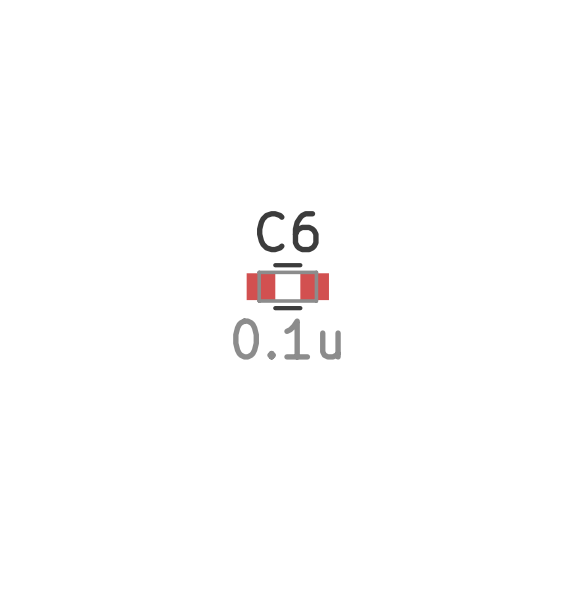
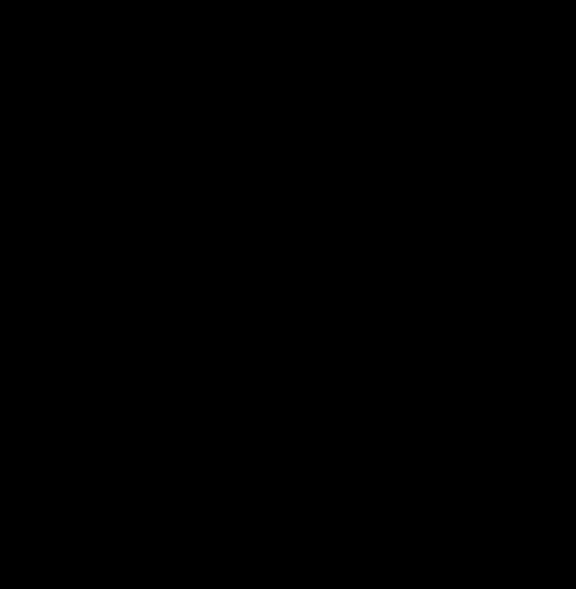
C6: 0.1u (287, 286) -> none

